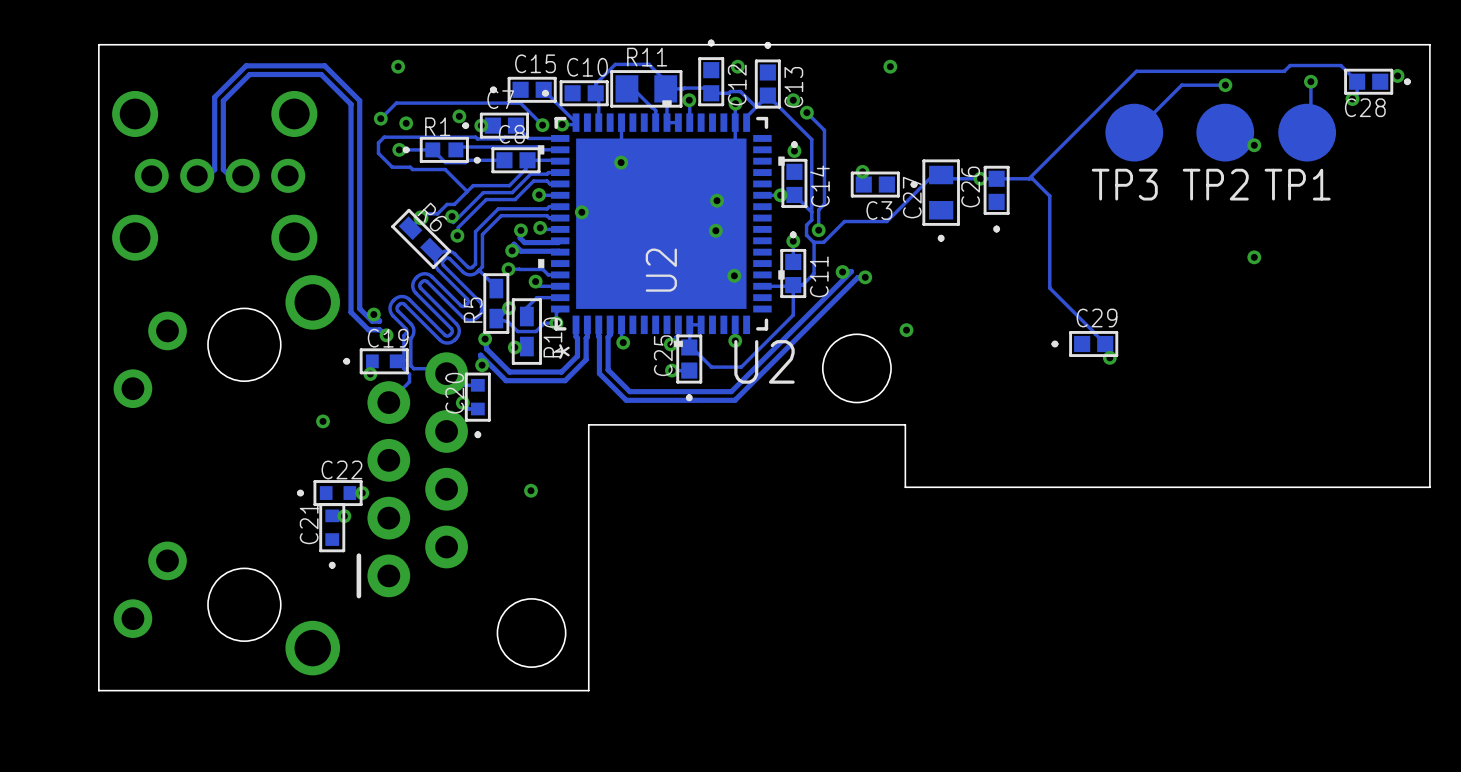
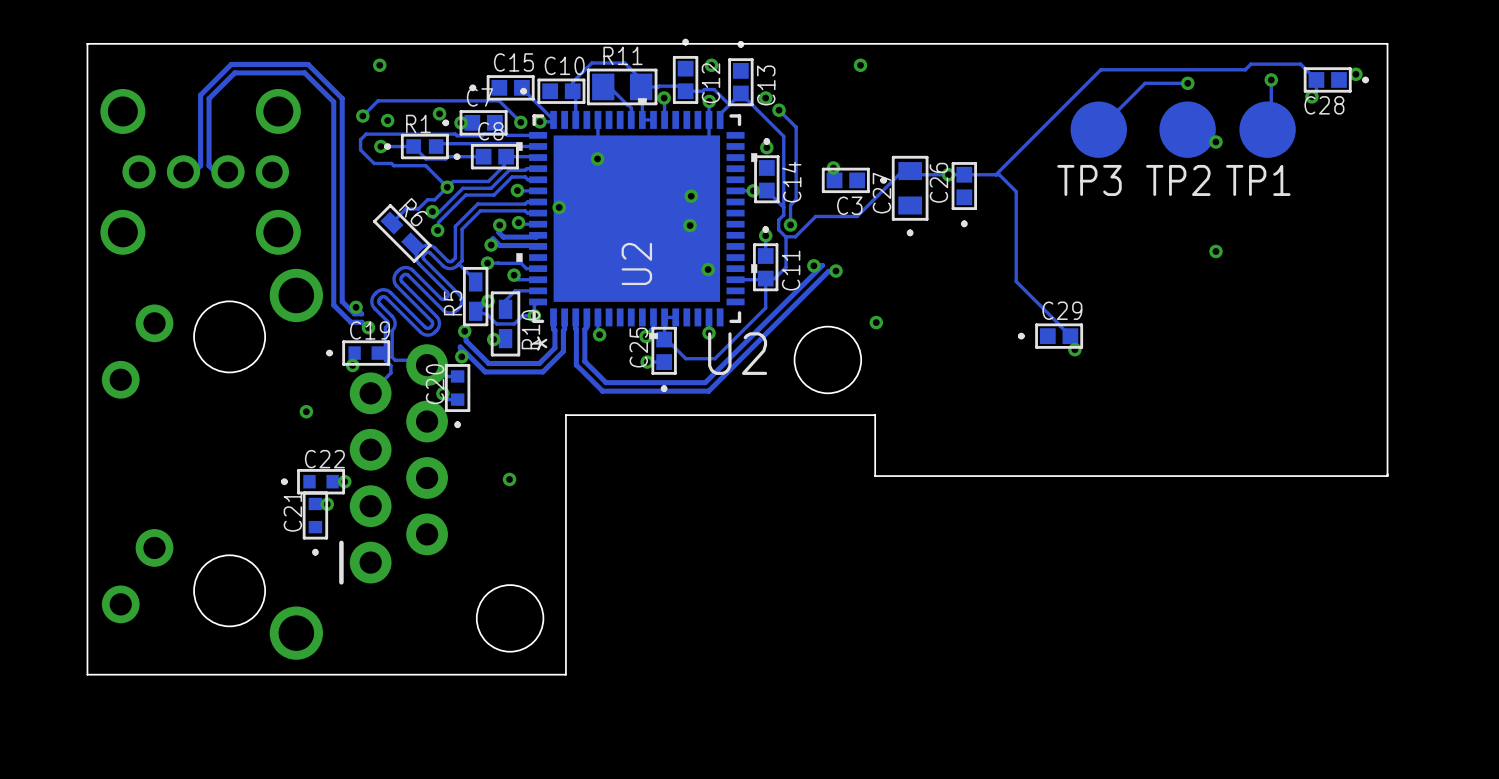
via: none -> (447, 187)
via: (421, 217) -> none

